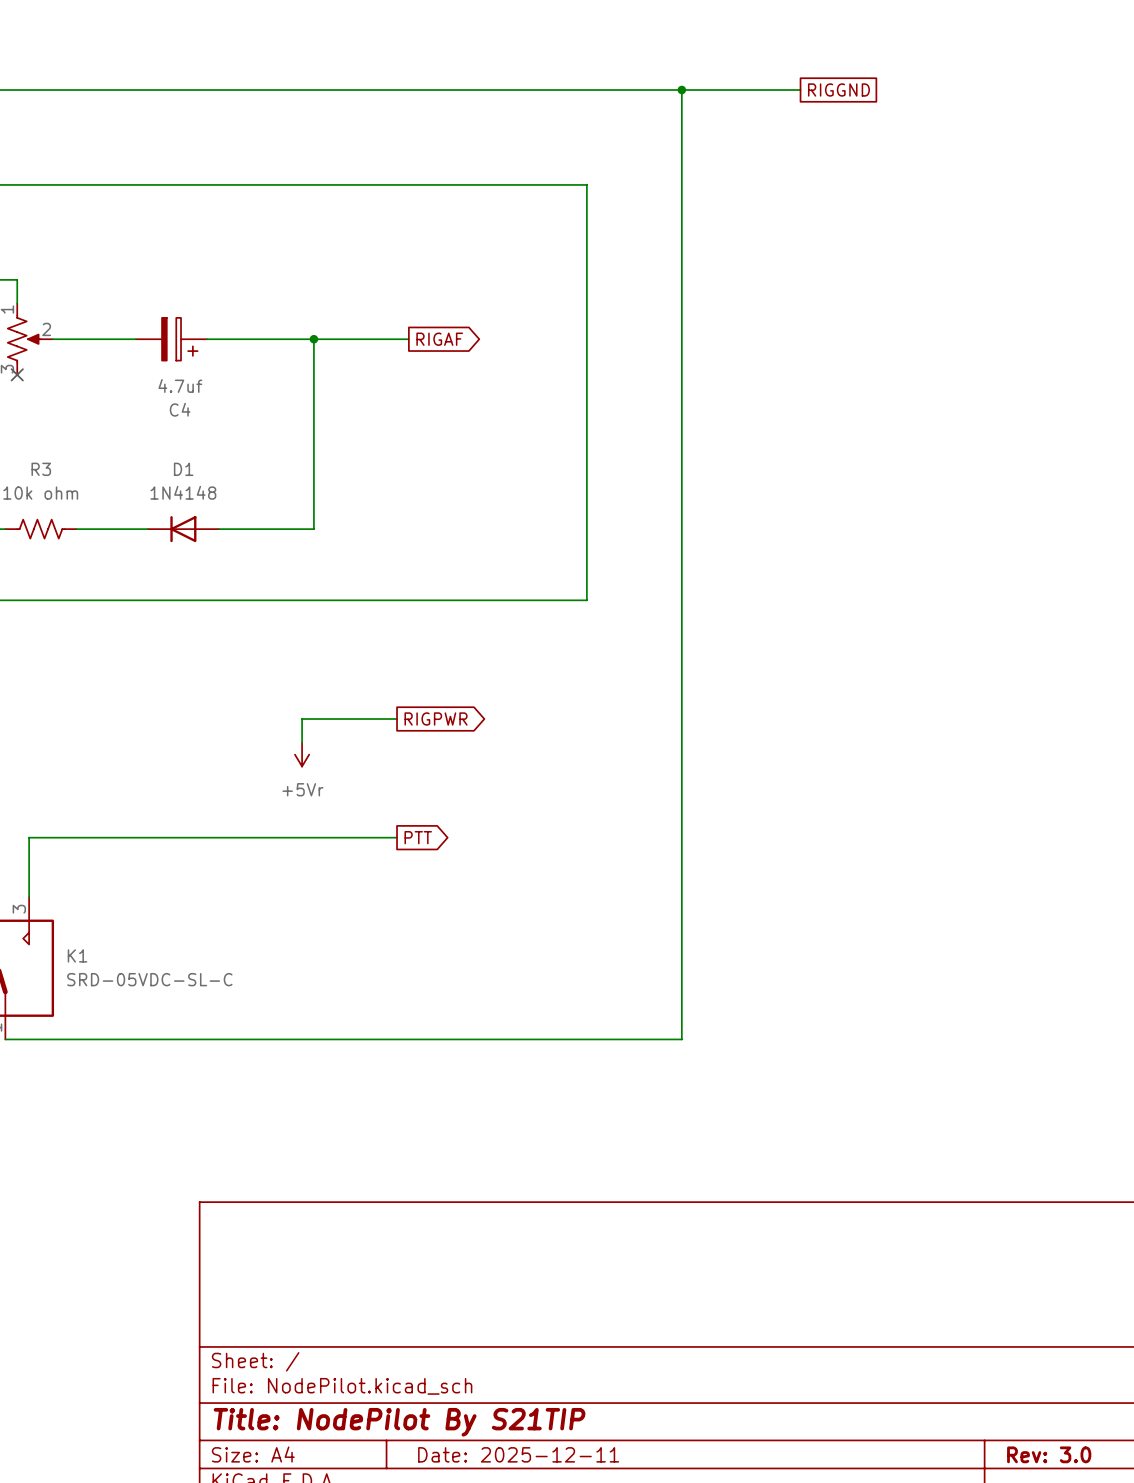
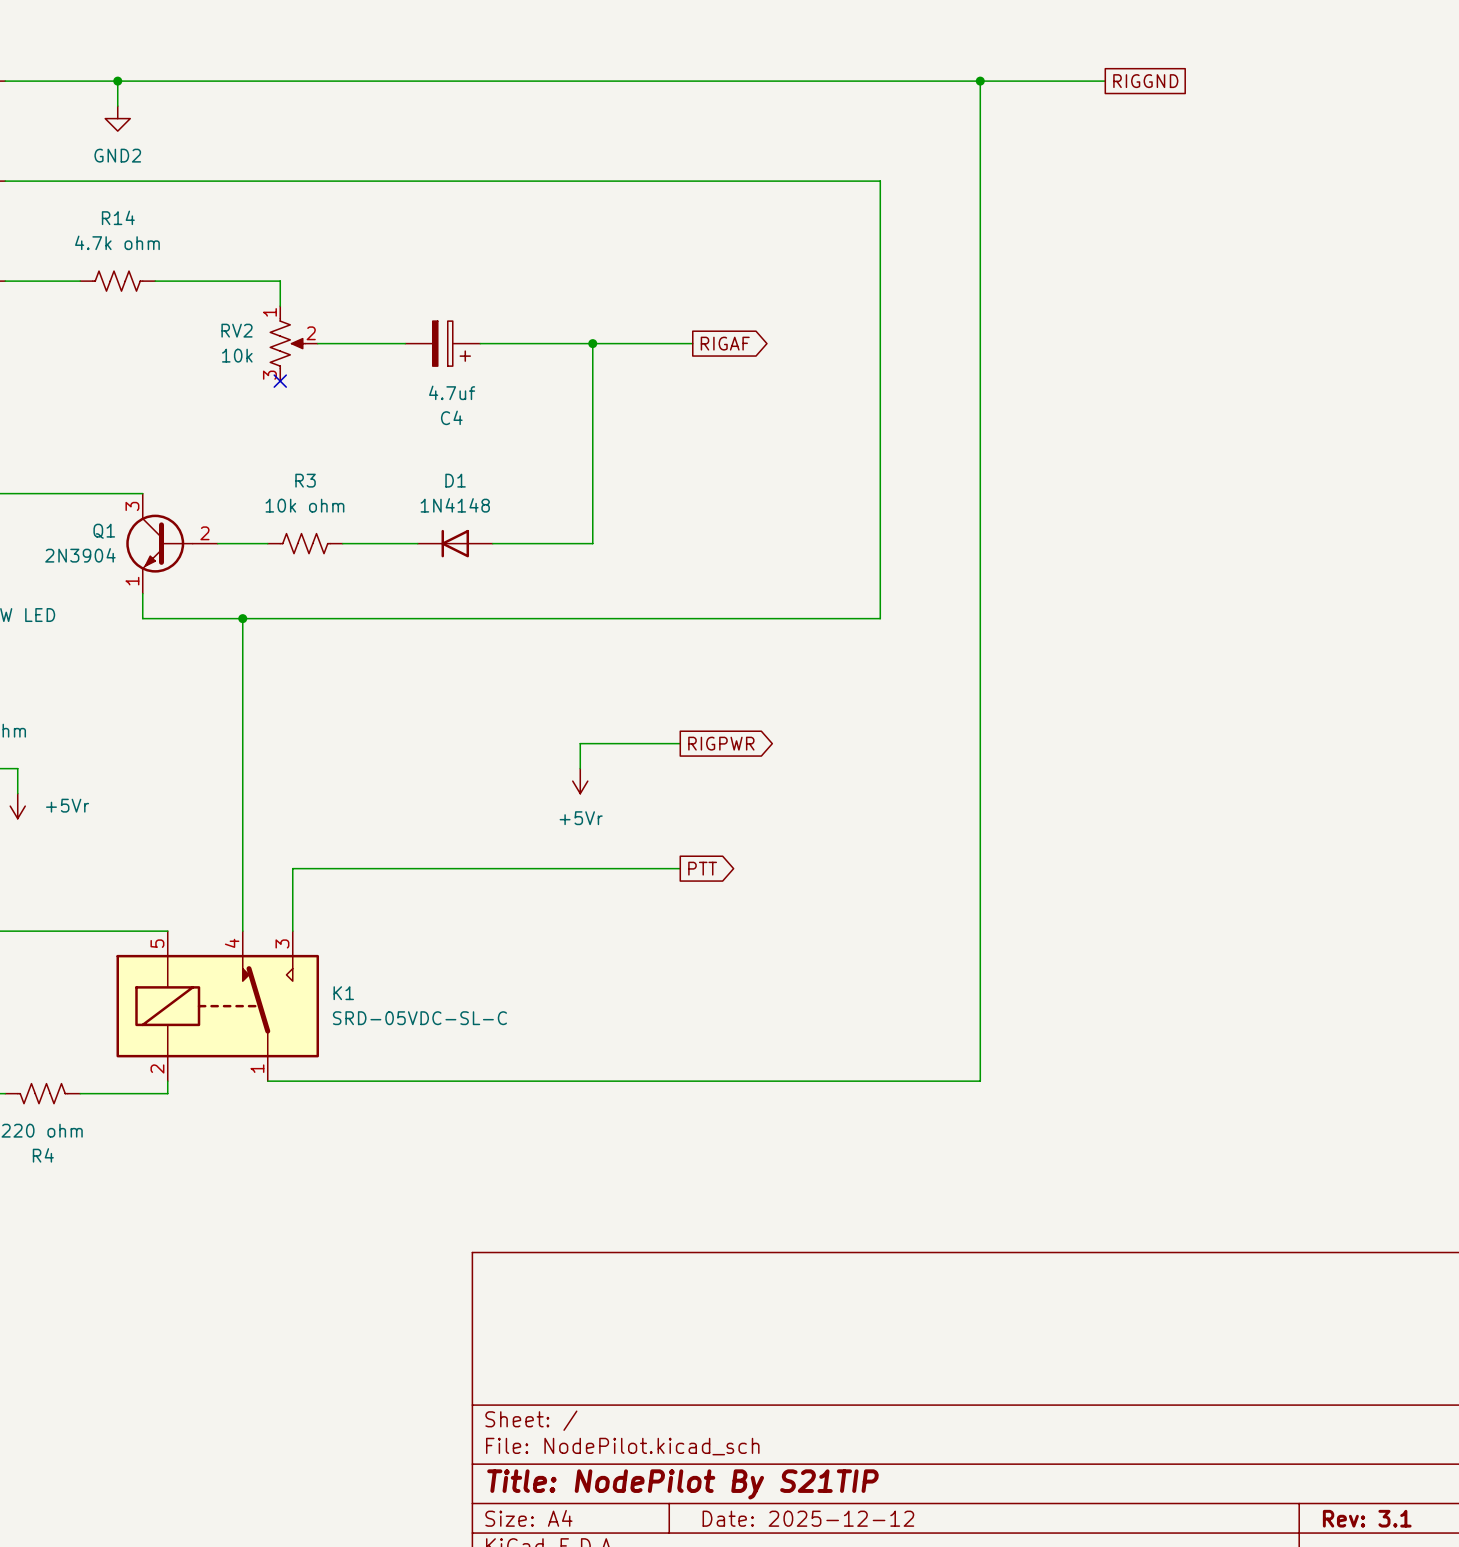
title block: Date: 2025-12-11 (518, 1454) -> Date: 2025-12-12 (808, 1518)
title block: Rev: 3.0 (1049, 1454) -> Rev: 3.1 (1367, 1518)

